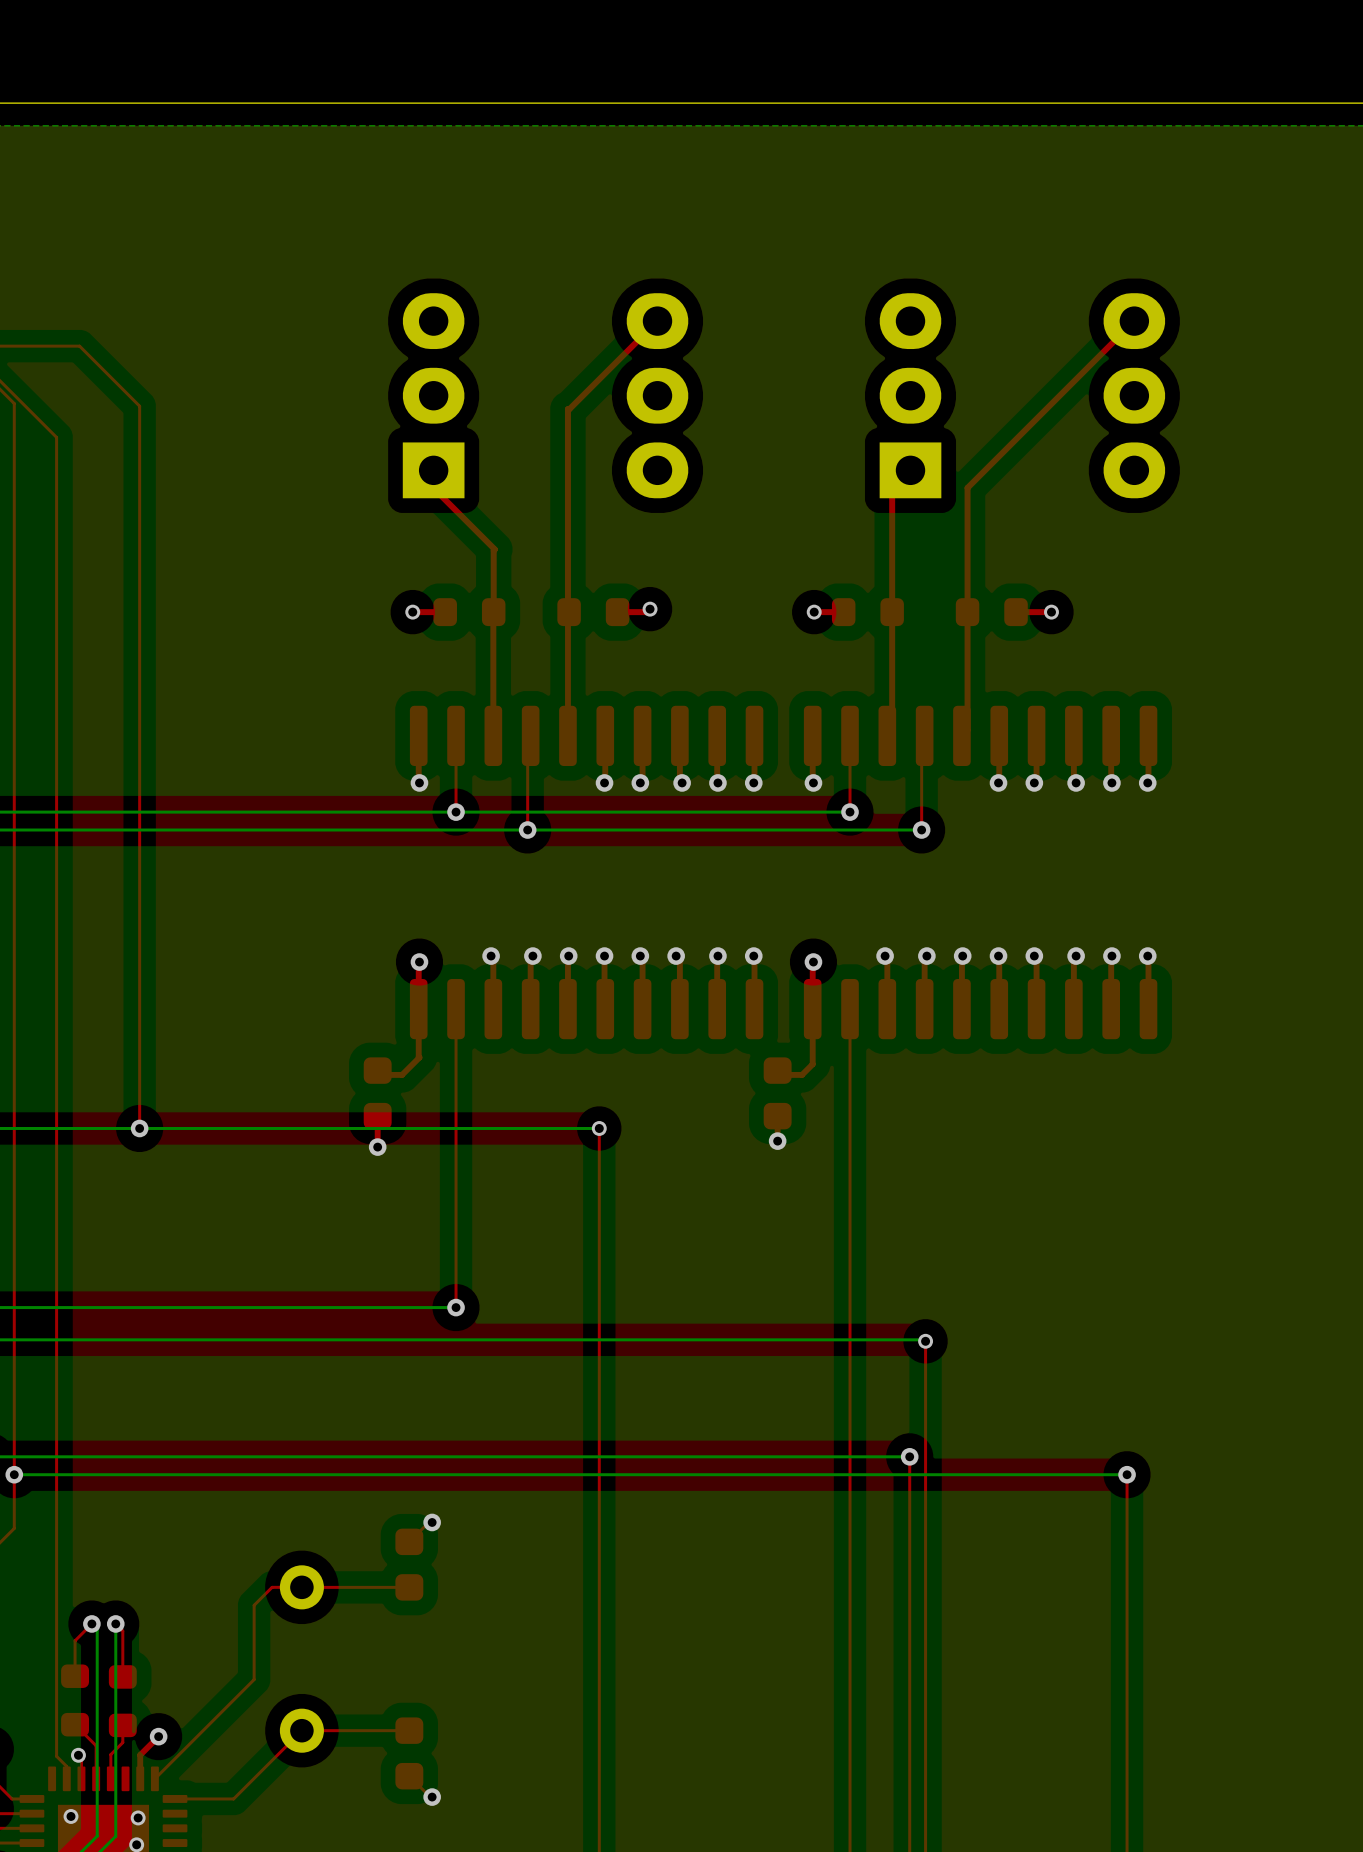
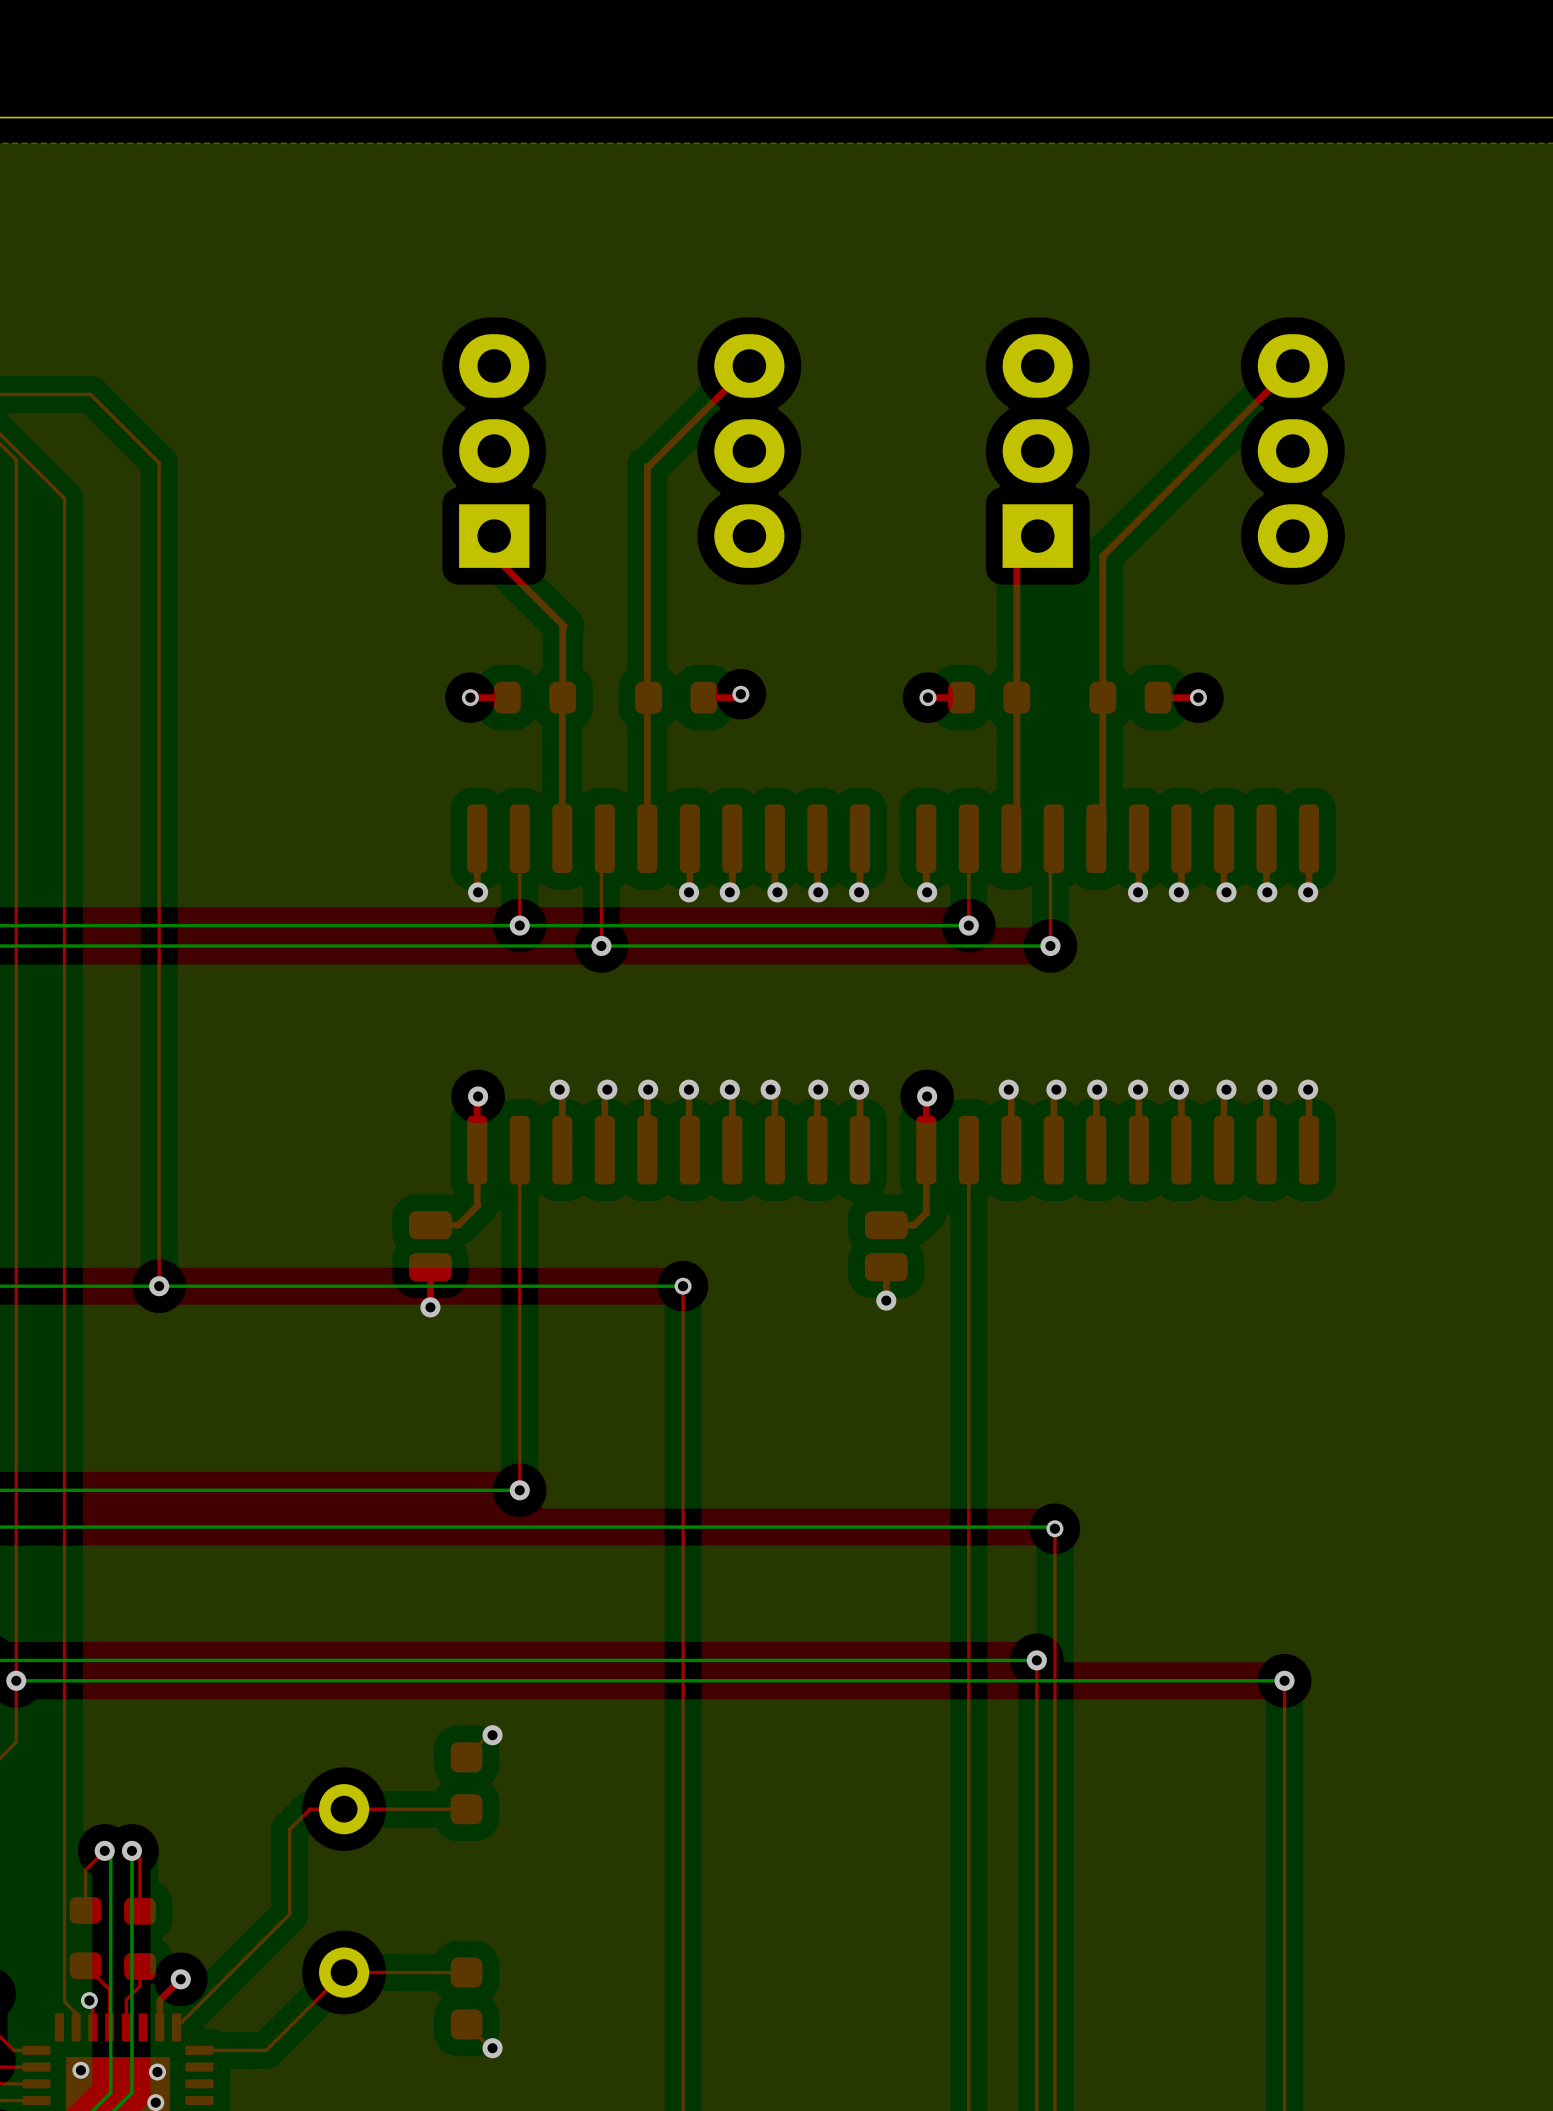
part footprint: [363, 1057, 392, 1130] -> [409, 1211, 452, 1282]
part footprint: [763, 1057, 792, 1130] -> [864, 1211, 908, 1282]

